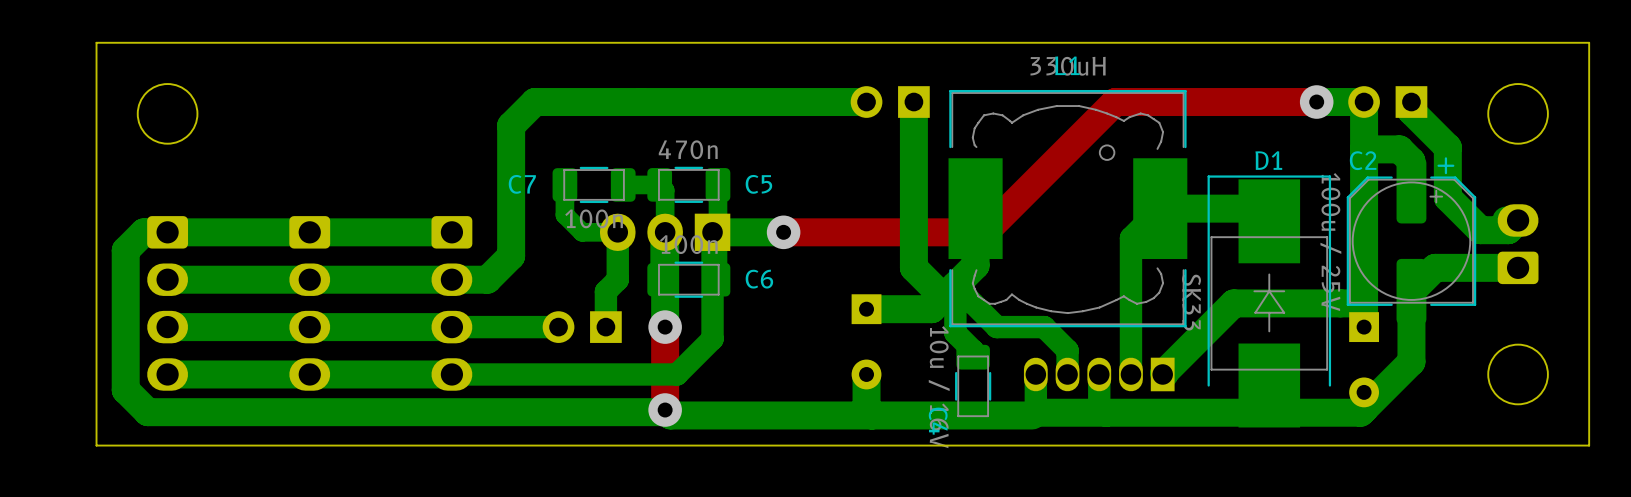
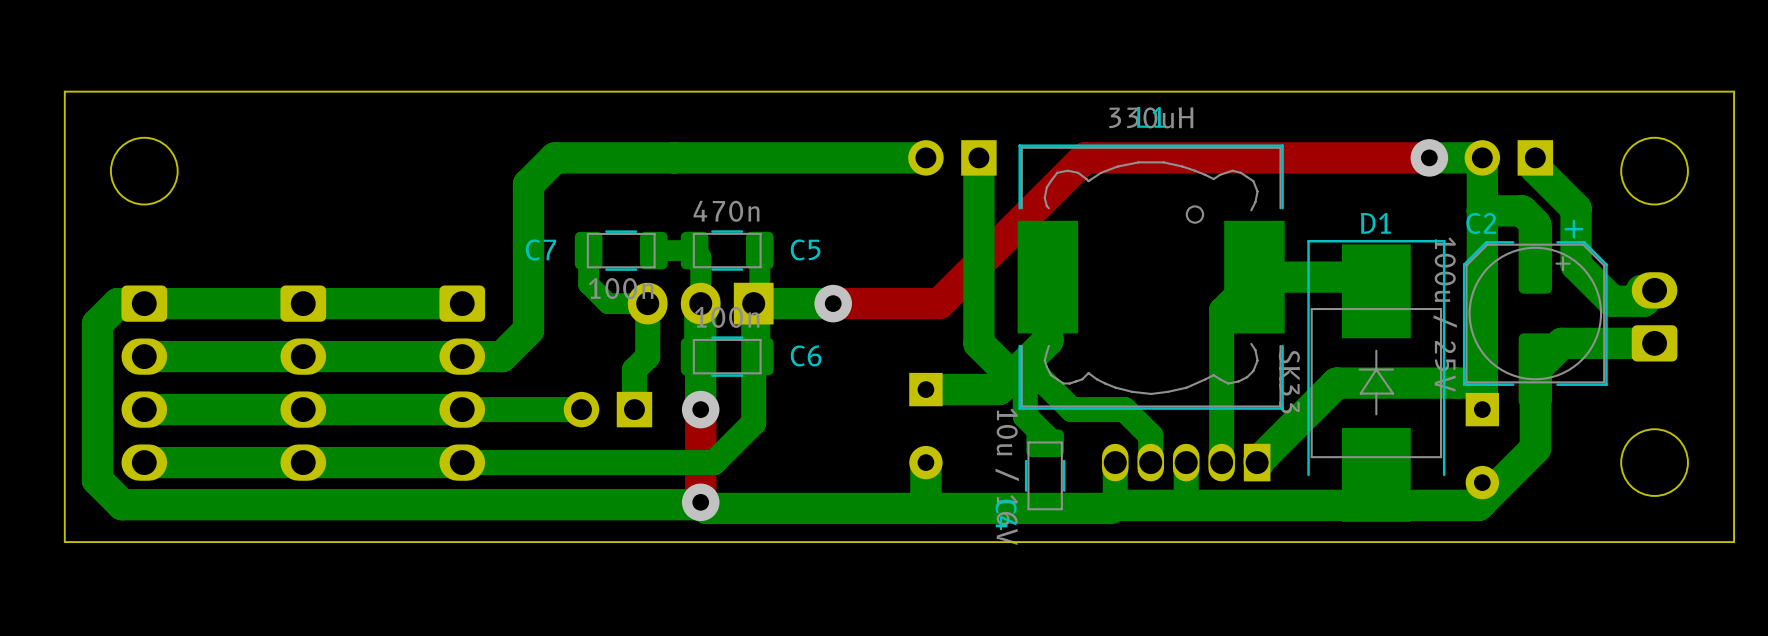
top track: (1115, 102) (984, 232) (878, 232) -> (1204, 157) (1084, 157) (939, 303)

